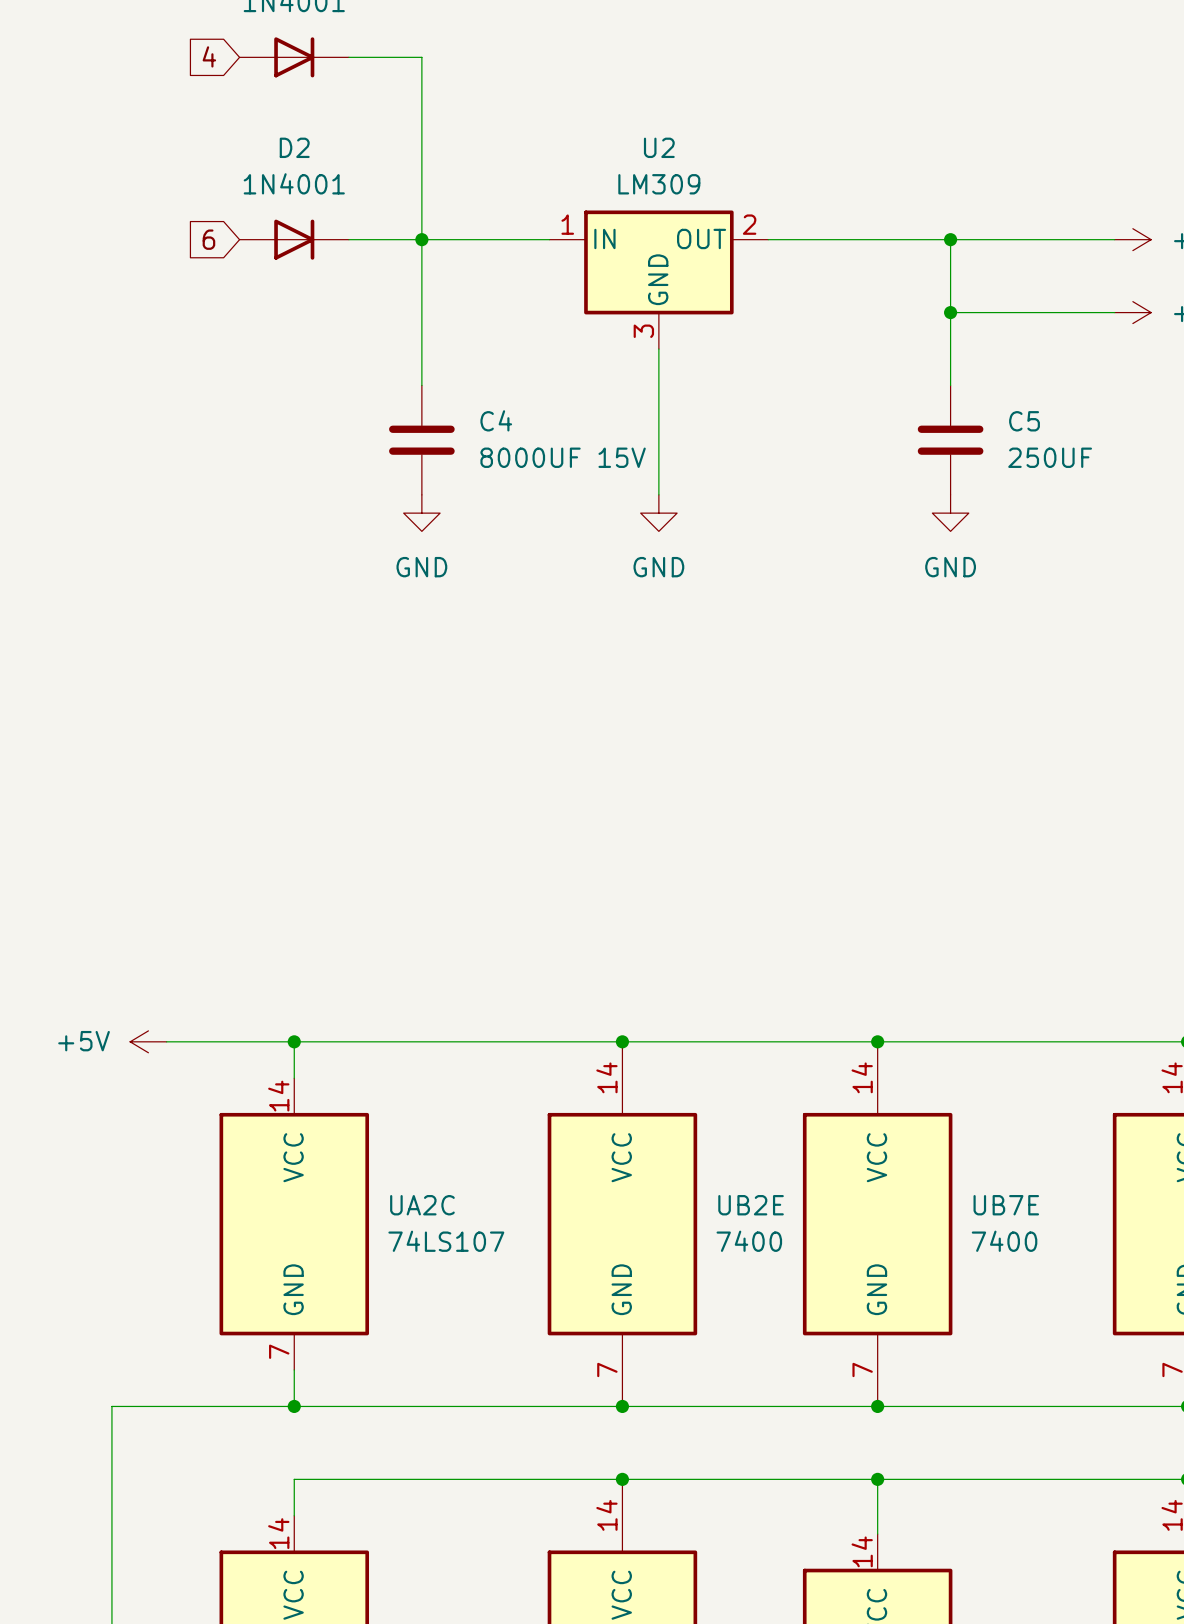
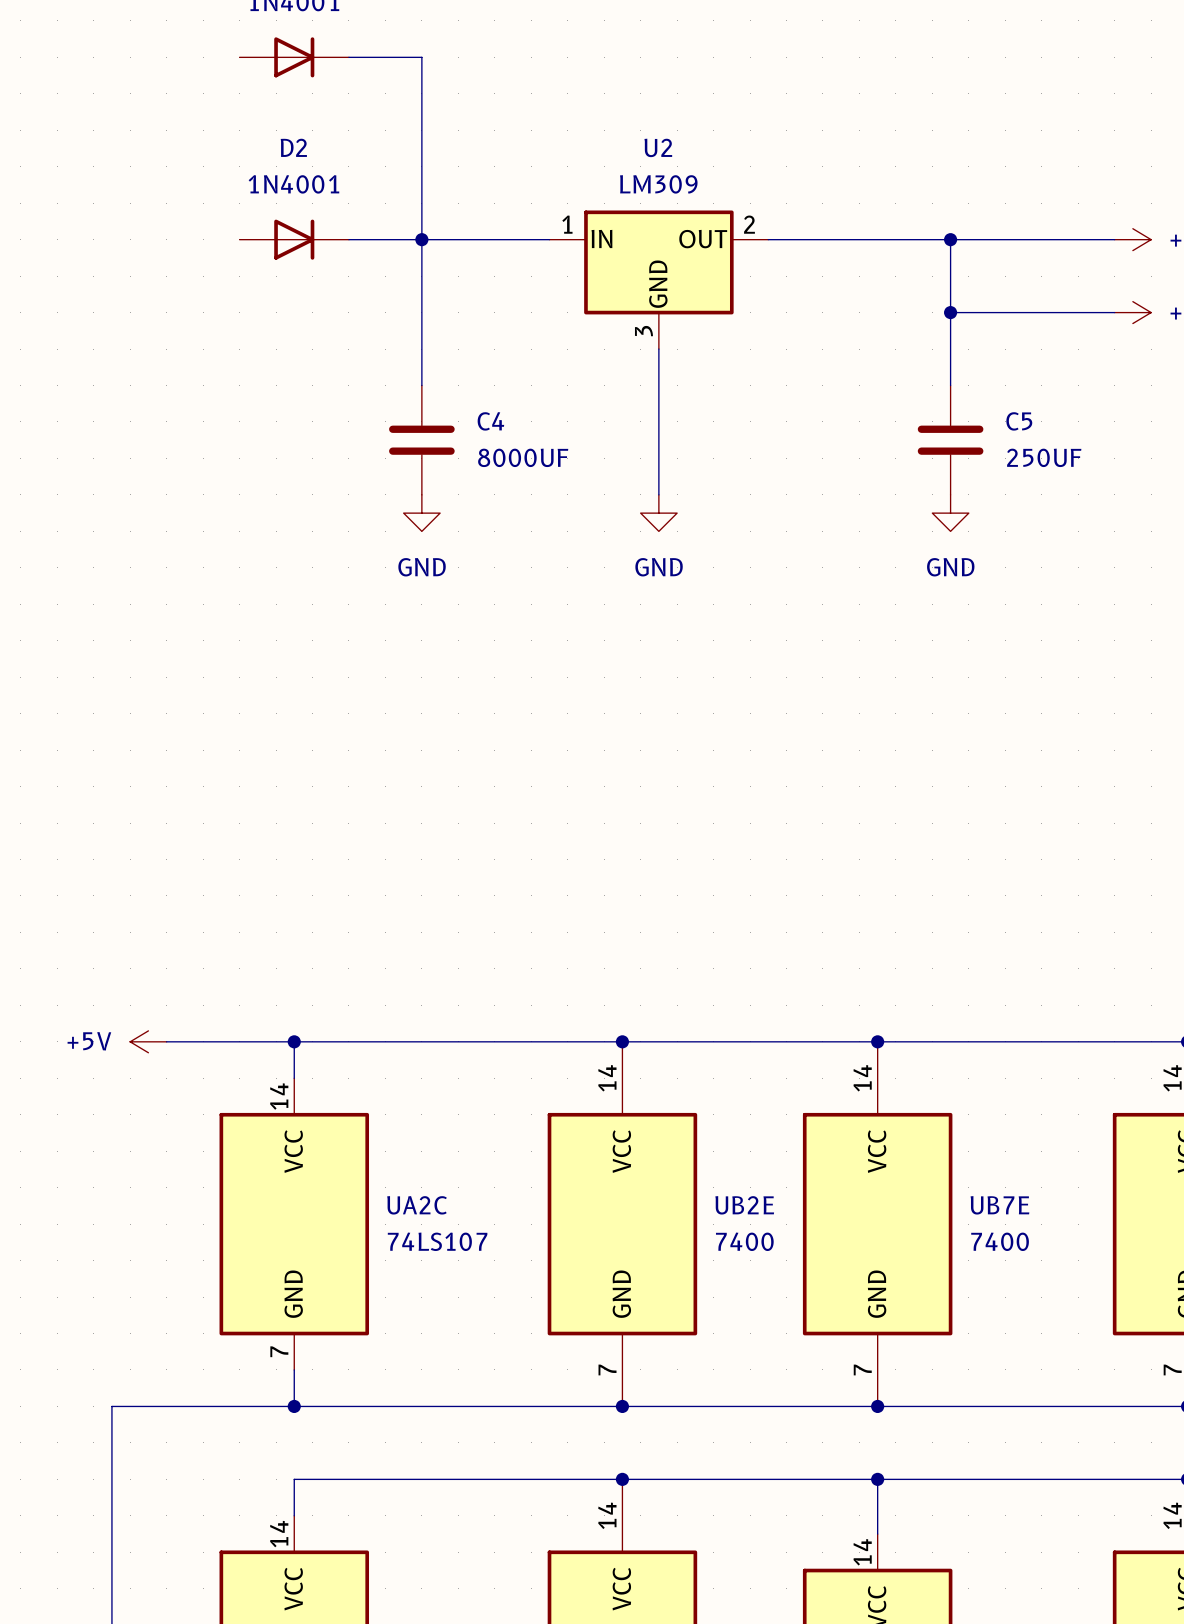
global label: 4 (209, 56) -> none
global label: 6 (208, 239) -> none
C4 value: 8000UF 15V (563, 457) -> 8000UF (523, 457)

